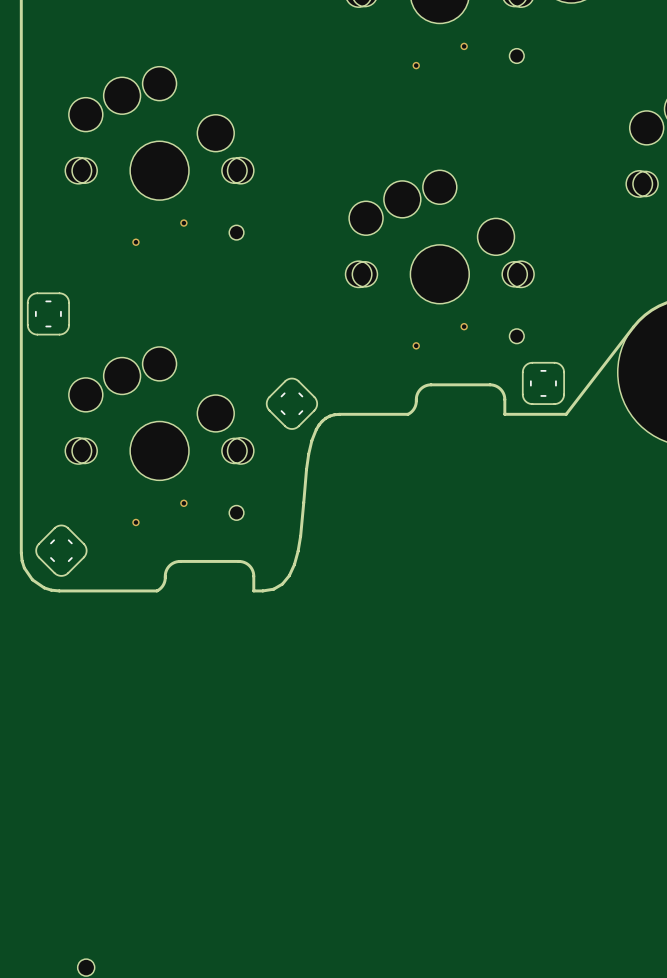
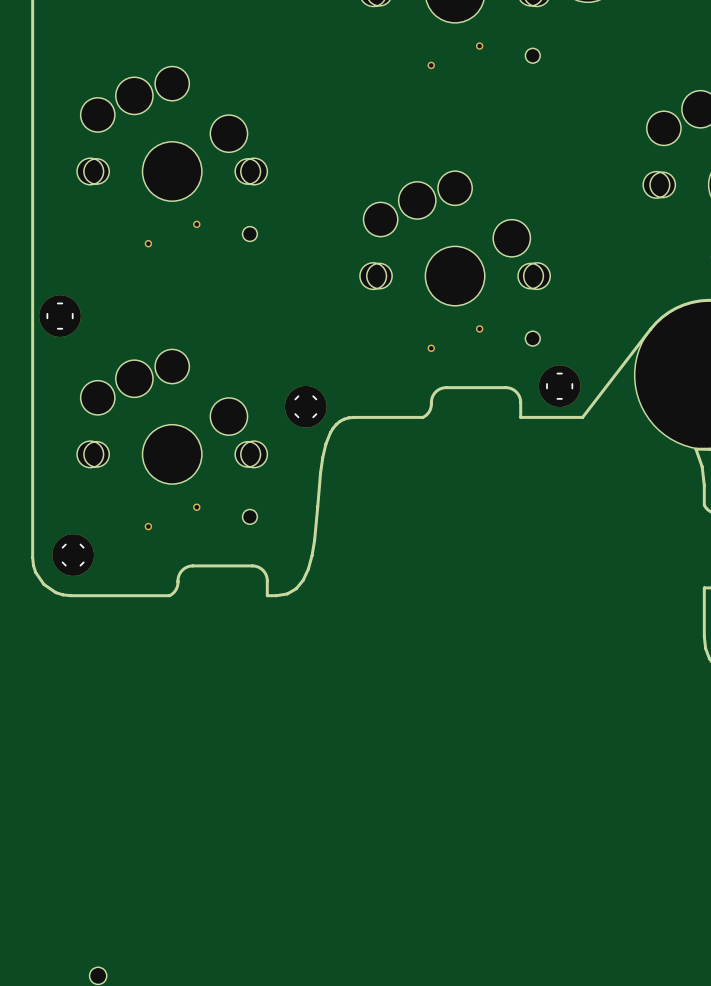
drawing: [26, 292, 70, 336] -> none
part: none -> (60, 316)
drawing: [521, 361, 565, 405] -> none
drawing: [265, 377, 319, 430] -> none
part: none -> (559, 386)
part: none -> (305, 406)
drawing: [35, 524, 88, 577] -> none
part: none -> (73, 555)

